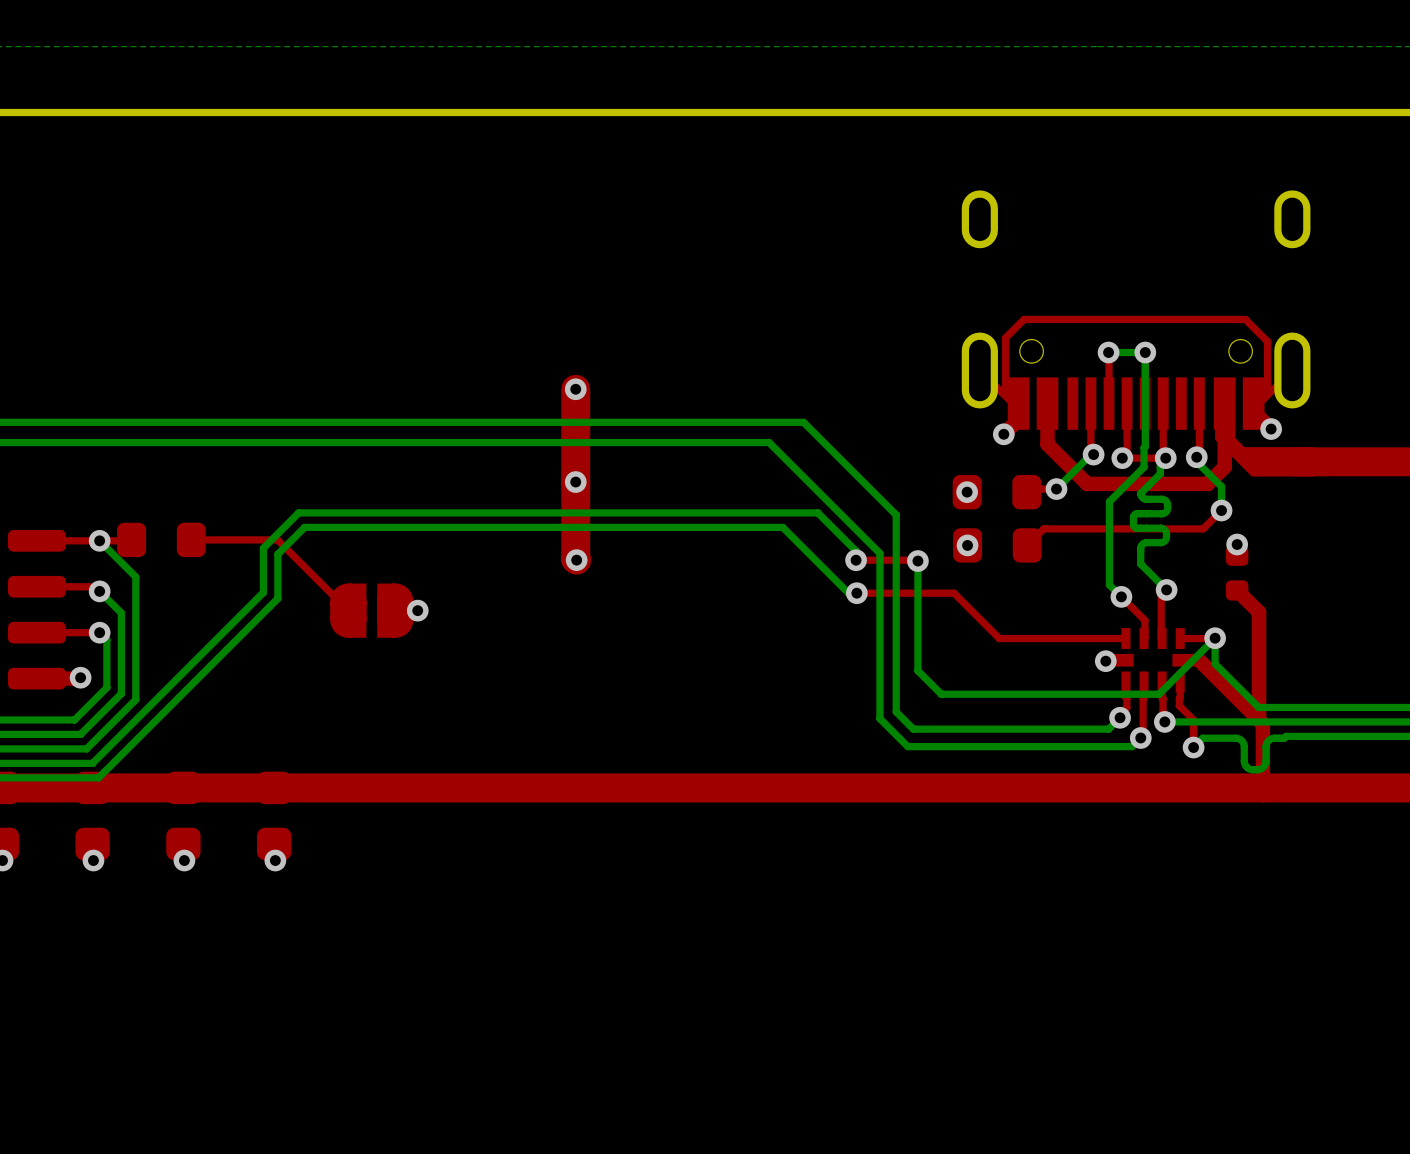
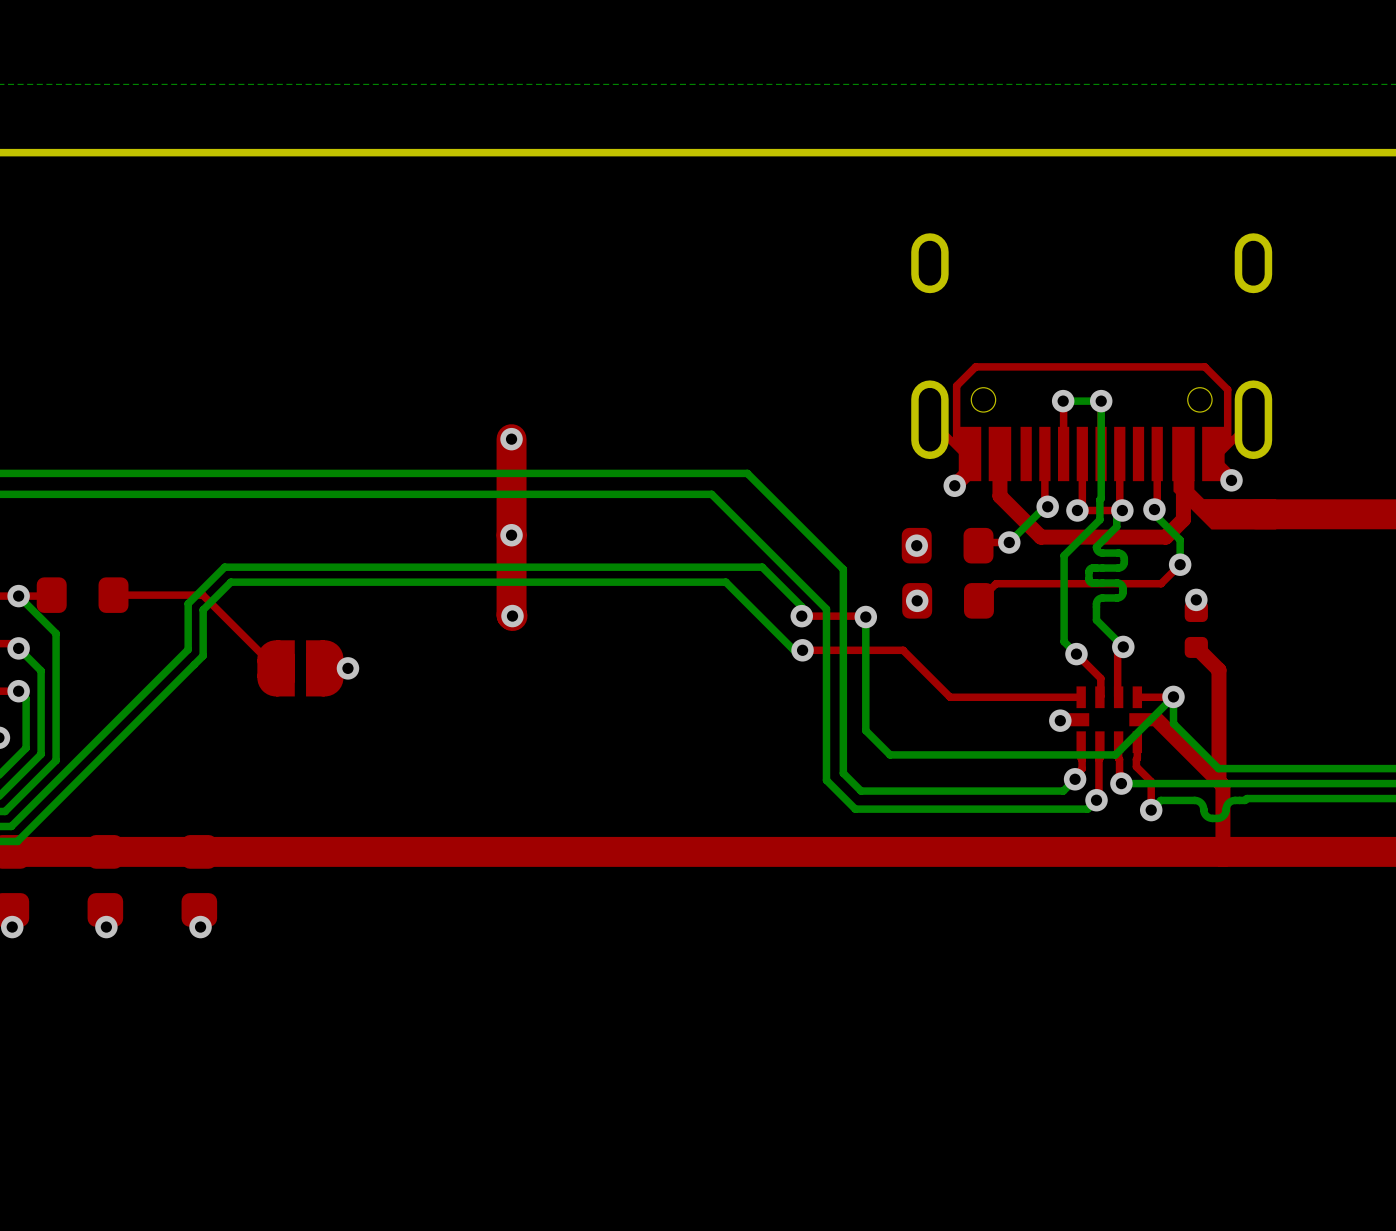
bottom track: (1266, 746) (1265, 763) (1262, 767) (1257, 769) (1250, 769) (1245, 765) (1244, 746) -> (1226, 809) (1223, 815) (1217, 818) (1207, 817) (1203, 809)

